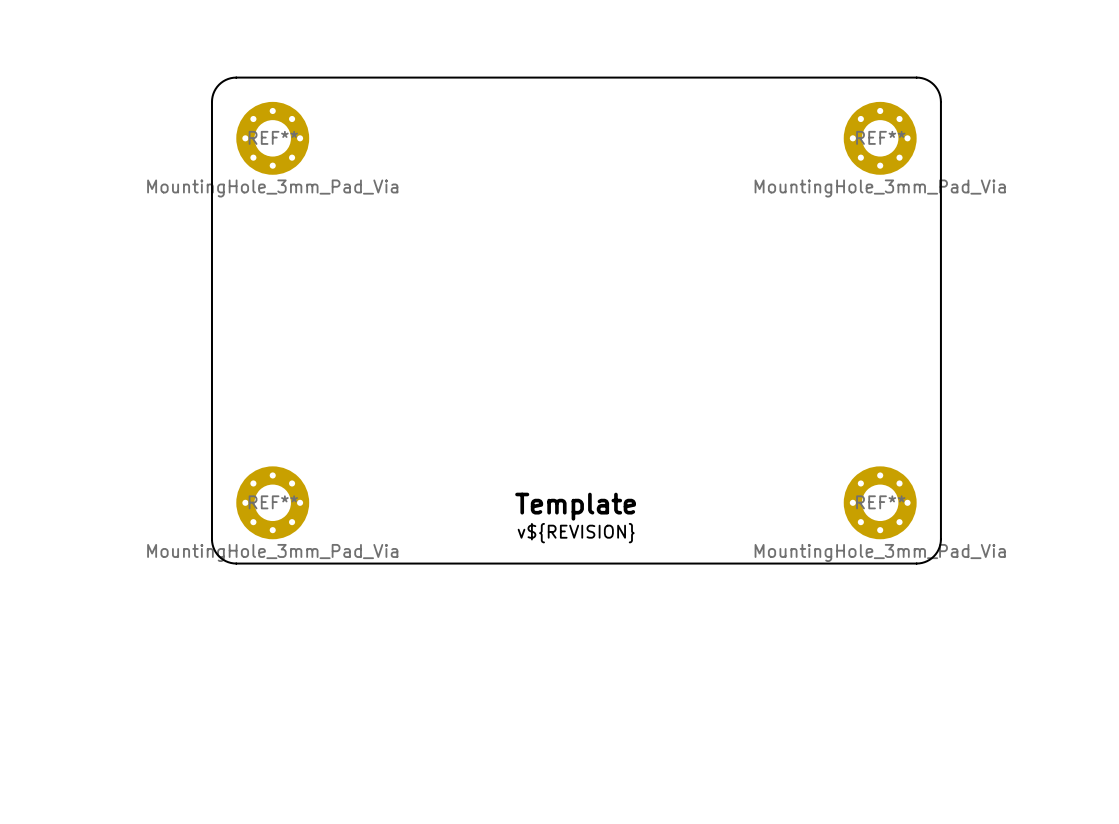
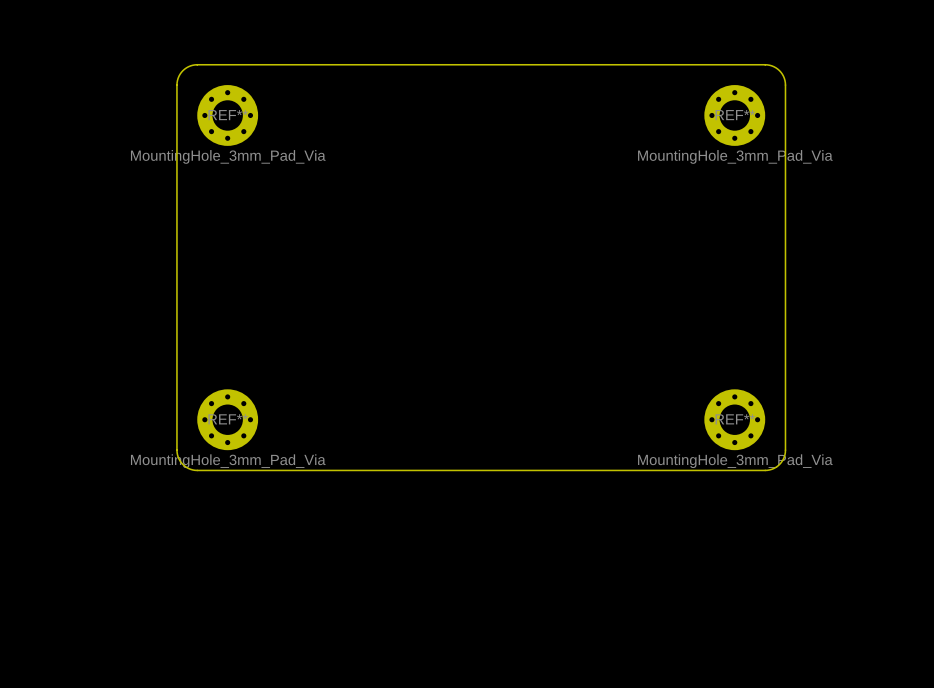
text: Template (575, 506) -> none
text: v${REVISION} (576, 533) -> none

